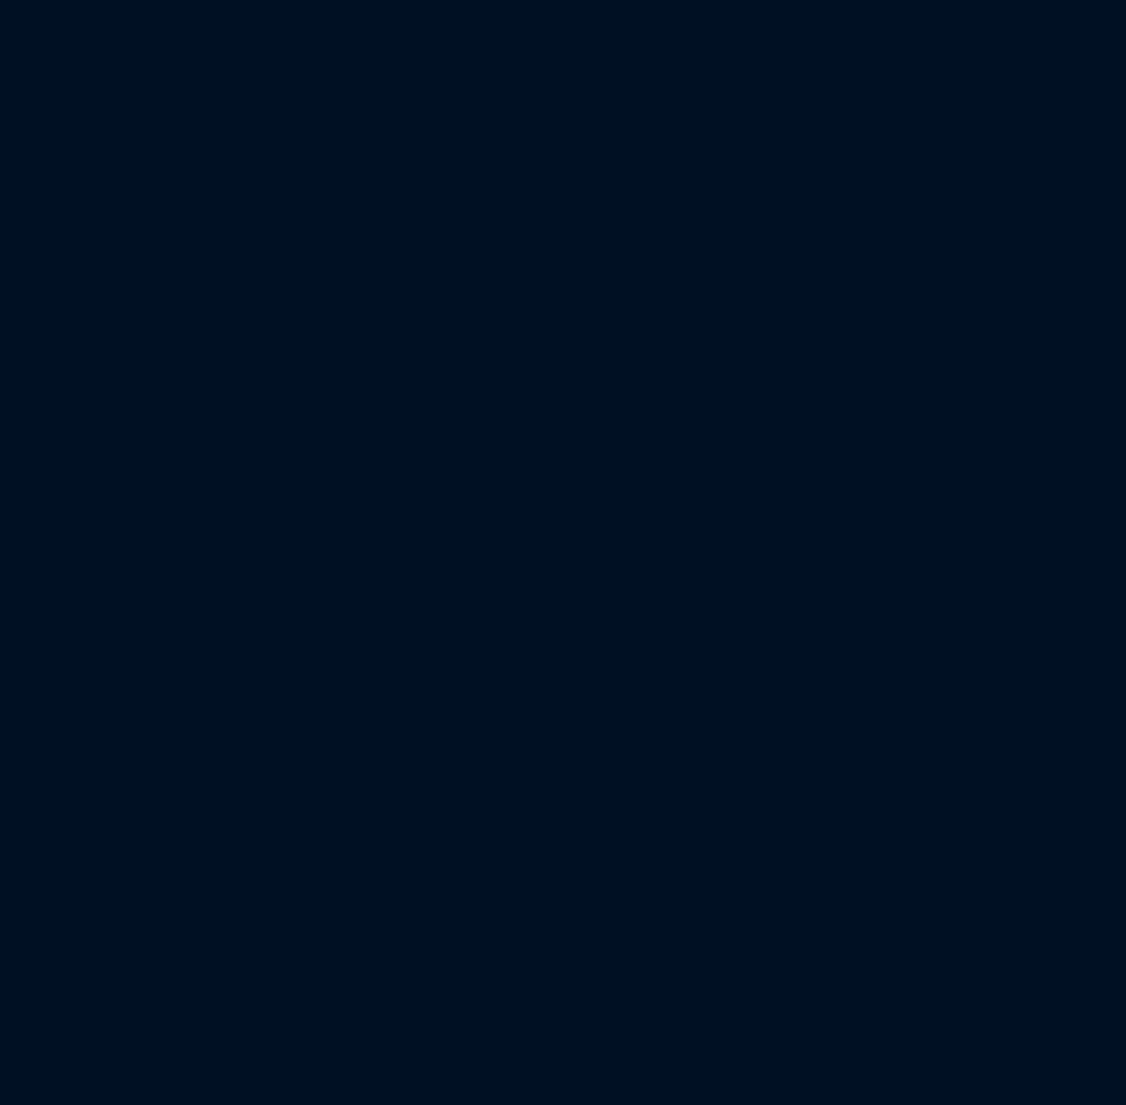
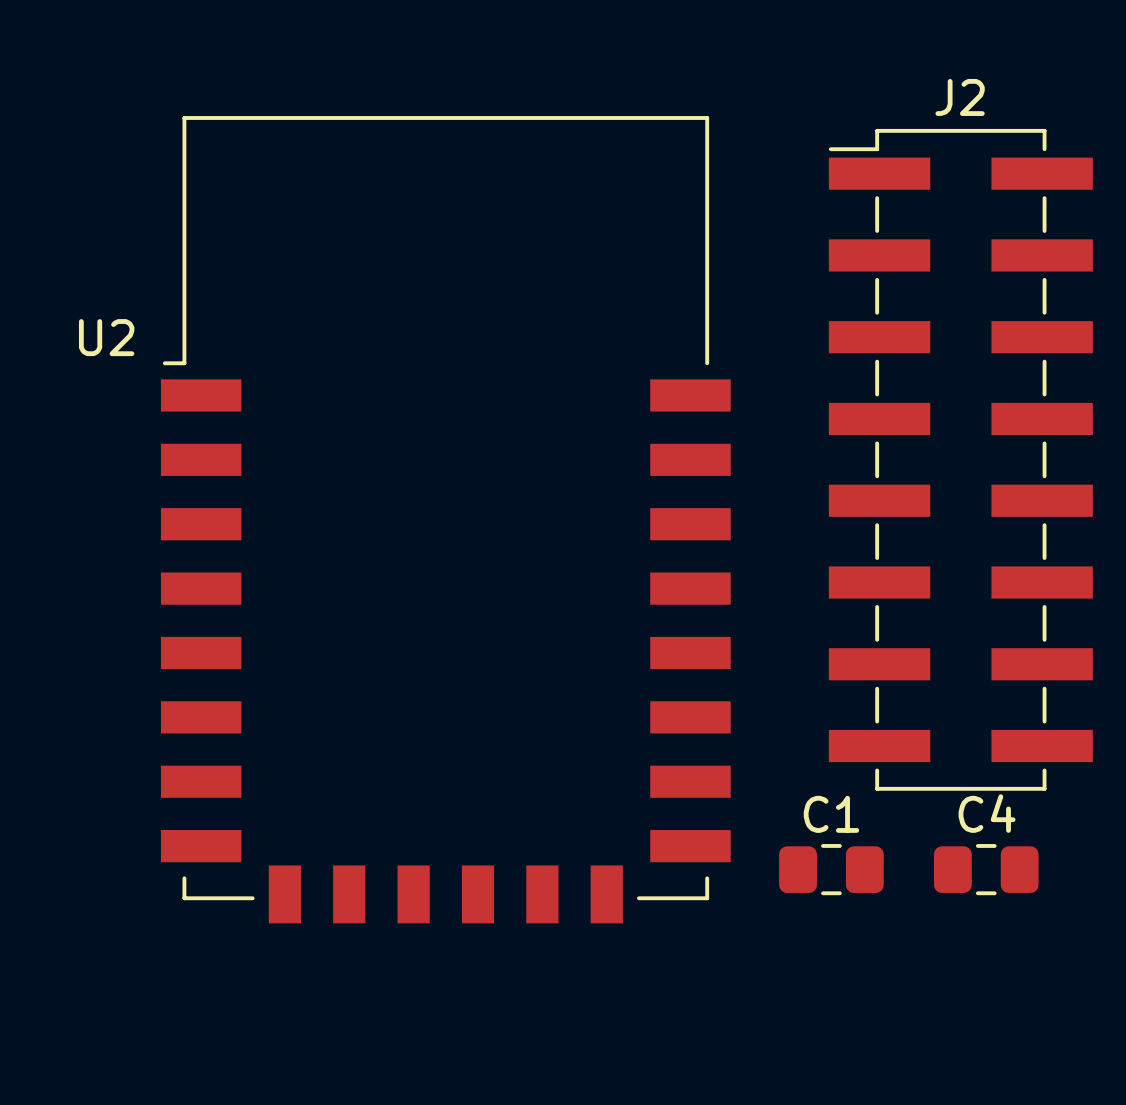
J2: none -> (960, 459)
U2: none -> (445, 519)
C1: none -> (831, 869)
C4: none -> (986, 869)

